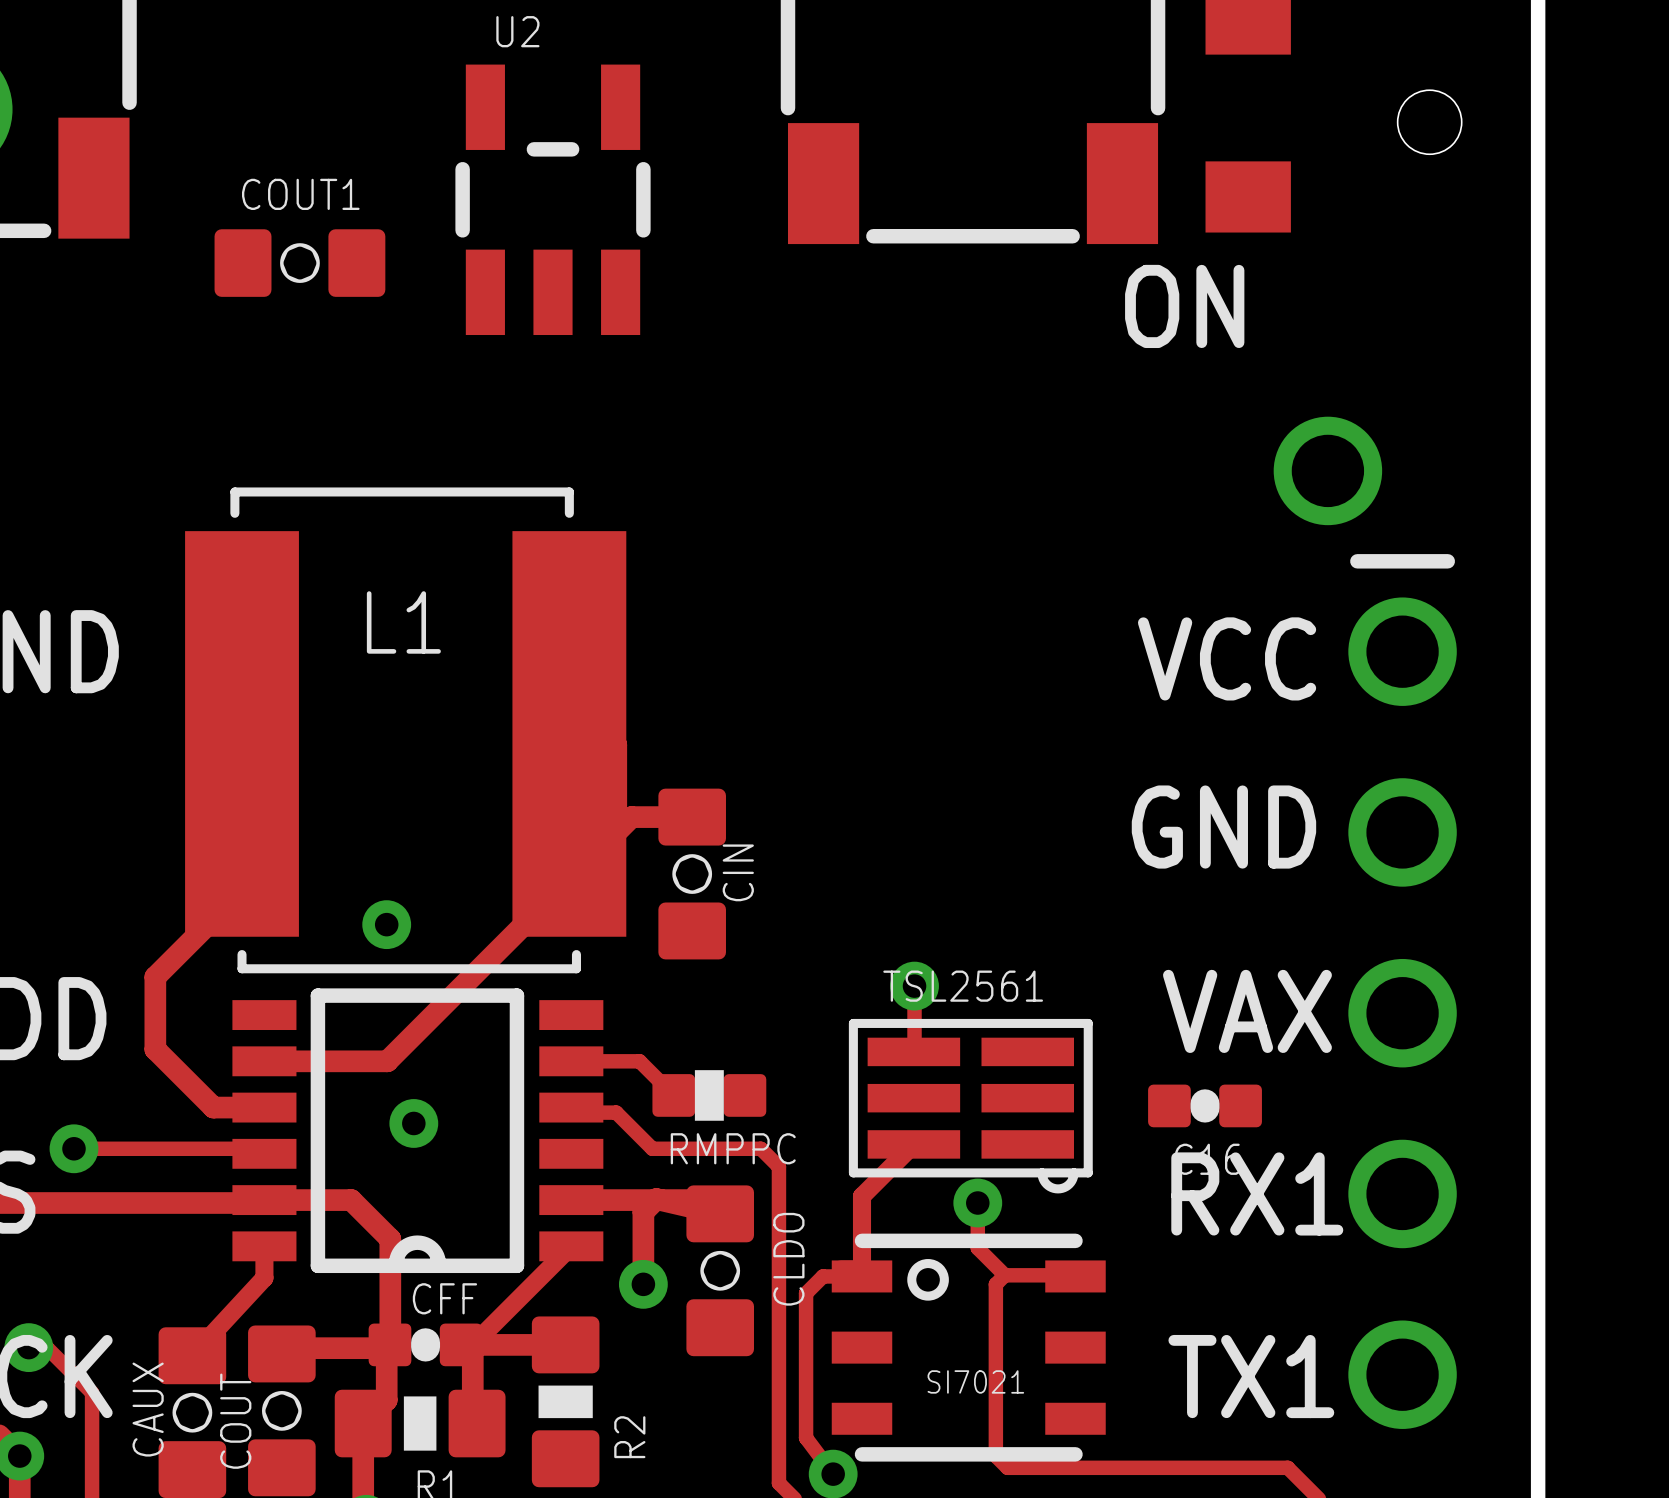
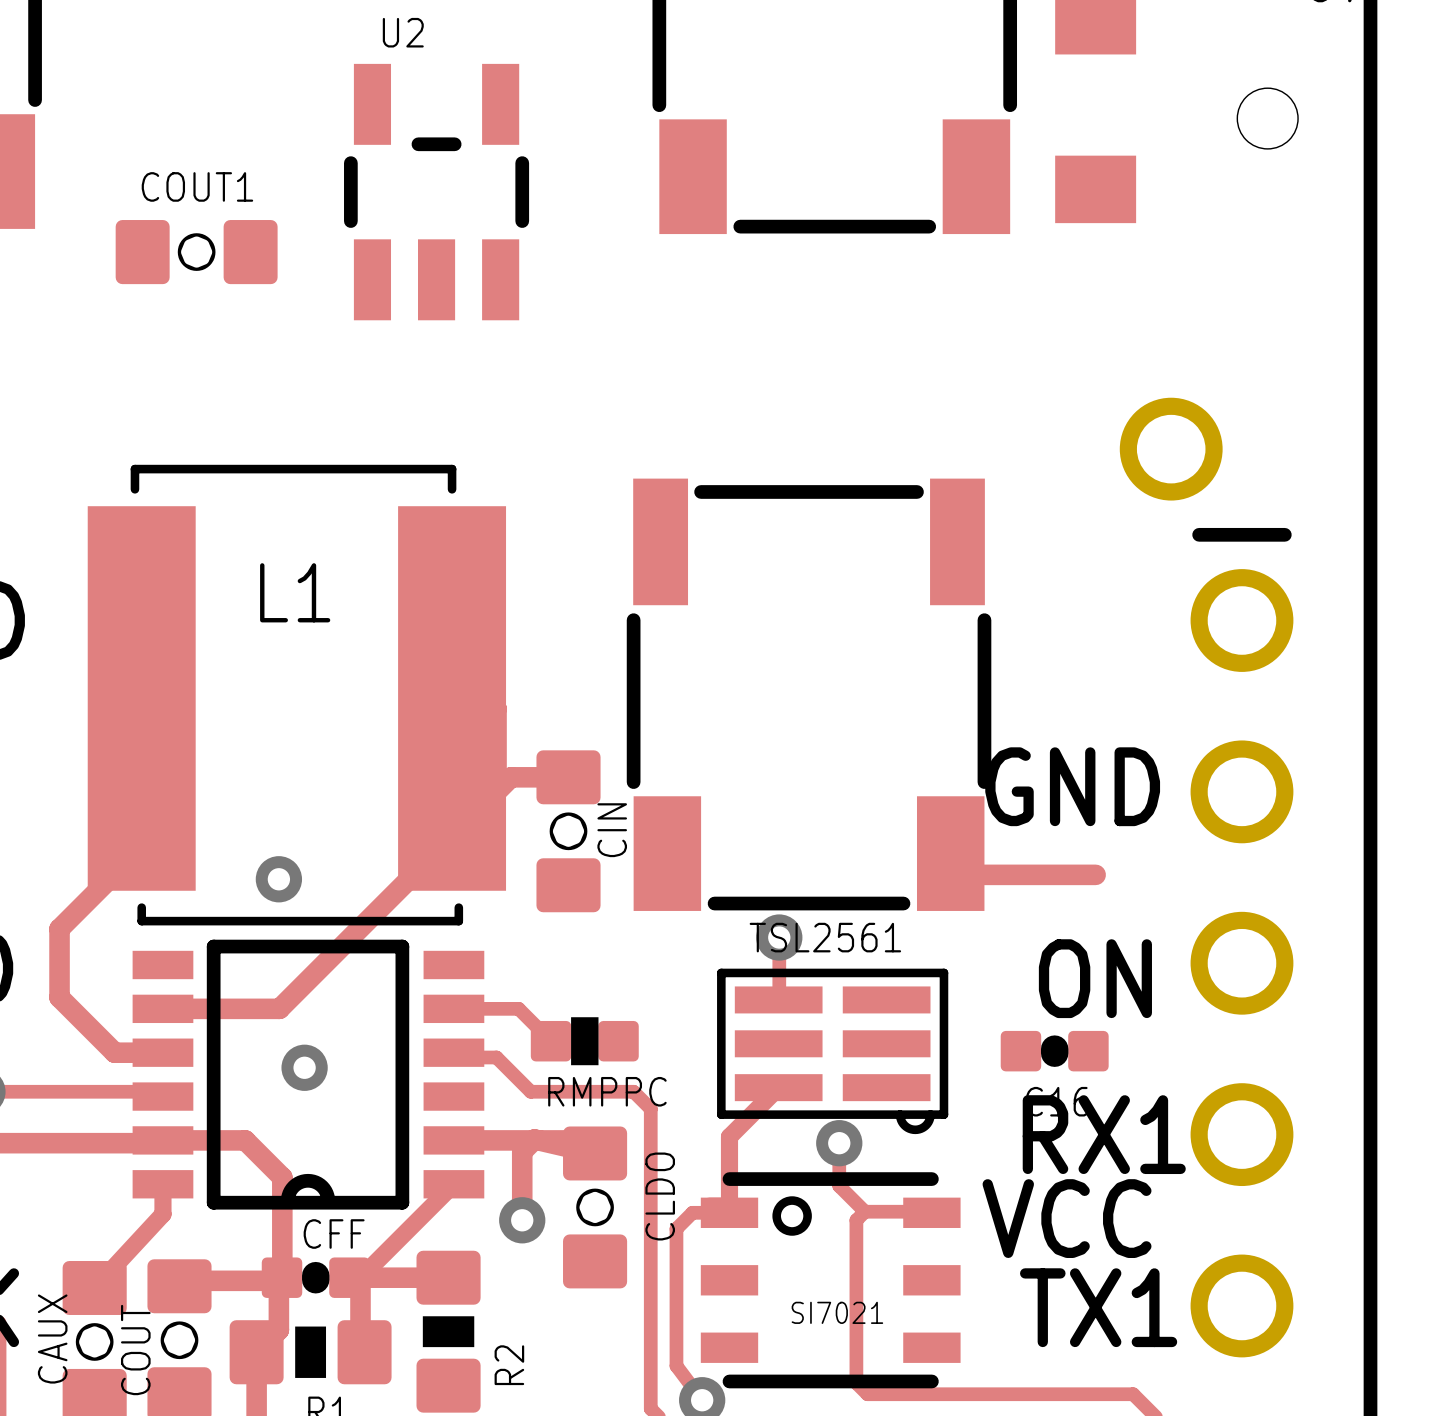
text position: ON (1184, 306) -> ON (1095, 978)
text position: VCC (1227, 658) -> VCC (1067, 1218)
part: none -> (809, 694)
track: none -> (950, 853) (971, 874) (1095, 874)
text: VAX (1247, 1011) -> none

